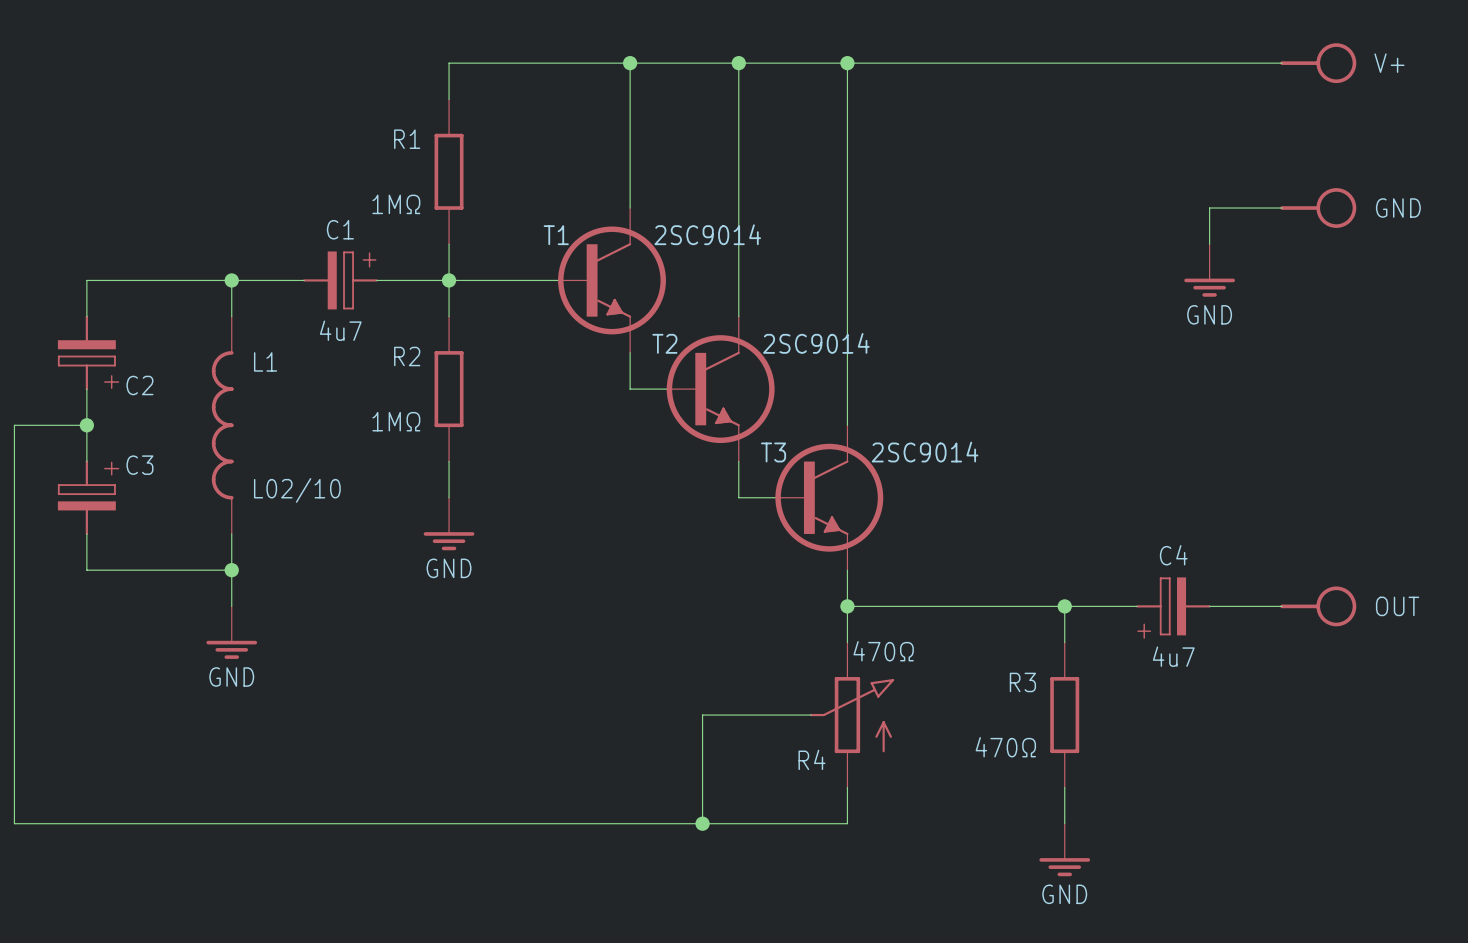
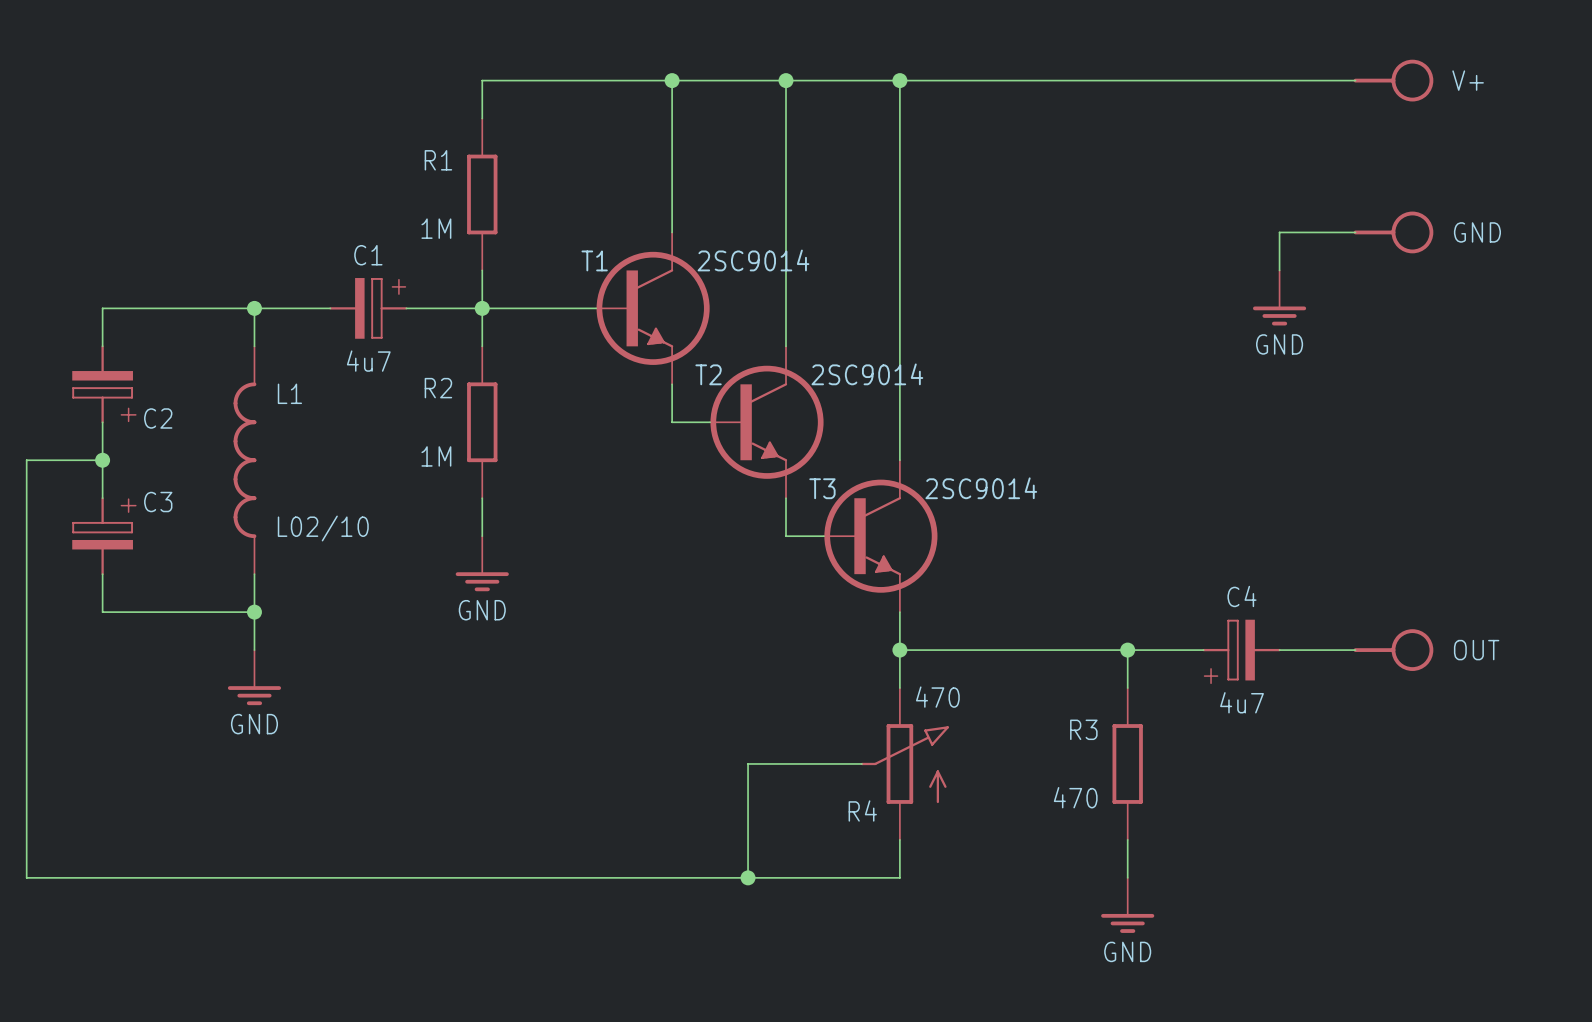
R1 value: 1MΩ (396, 204) -> 1M (436, 228)
R2 value: 1MΩ (396, 421) -> 1M (436, 456)
R4 value: 470Ω (883, 651) -> 470 (937, 697)
R3 value: 470Ω (1005, 747) -> 470 (1075, 797)

